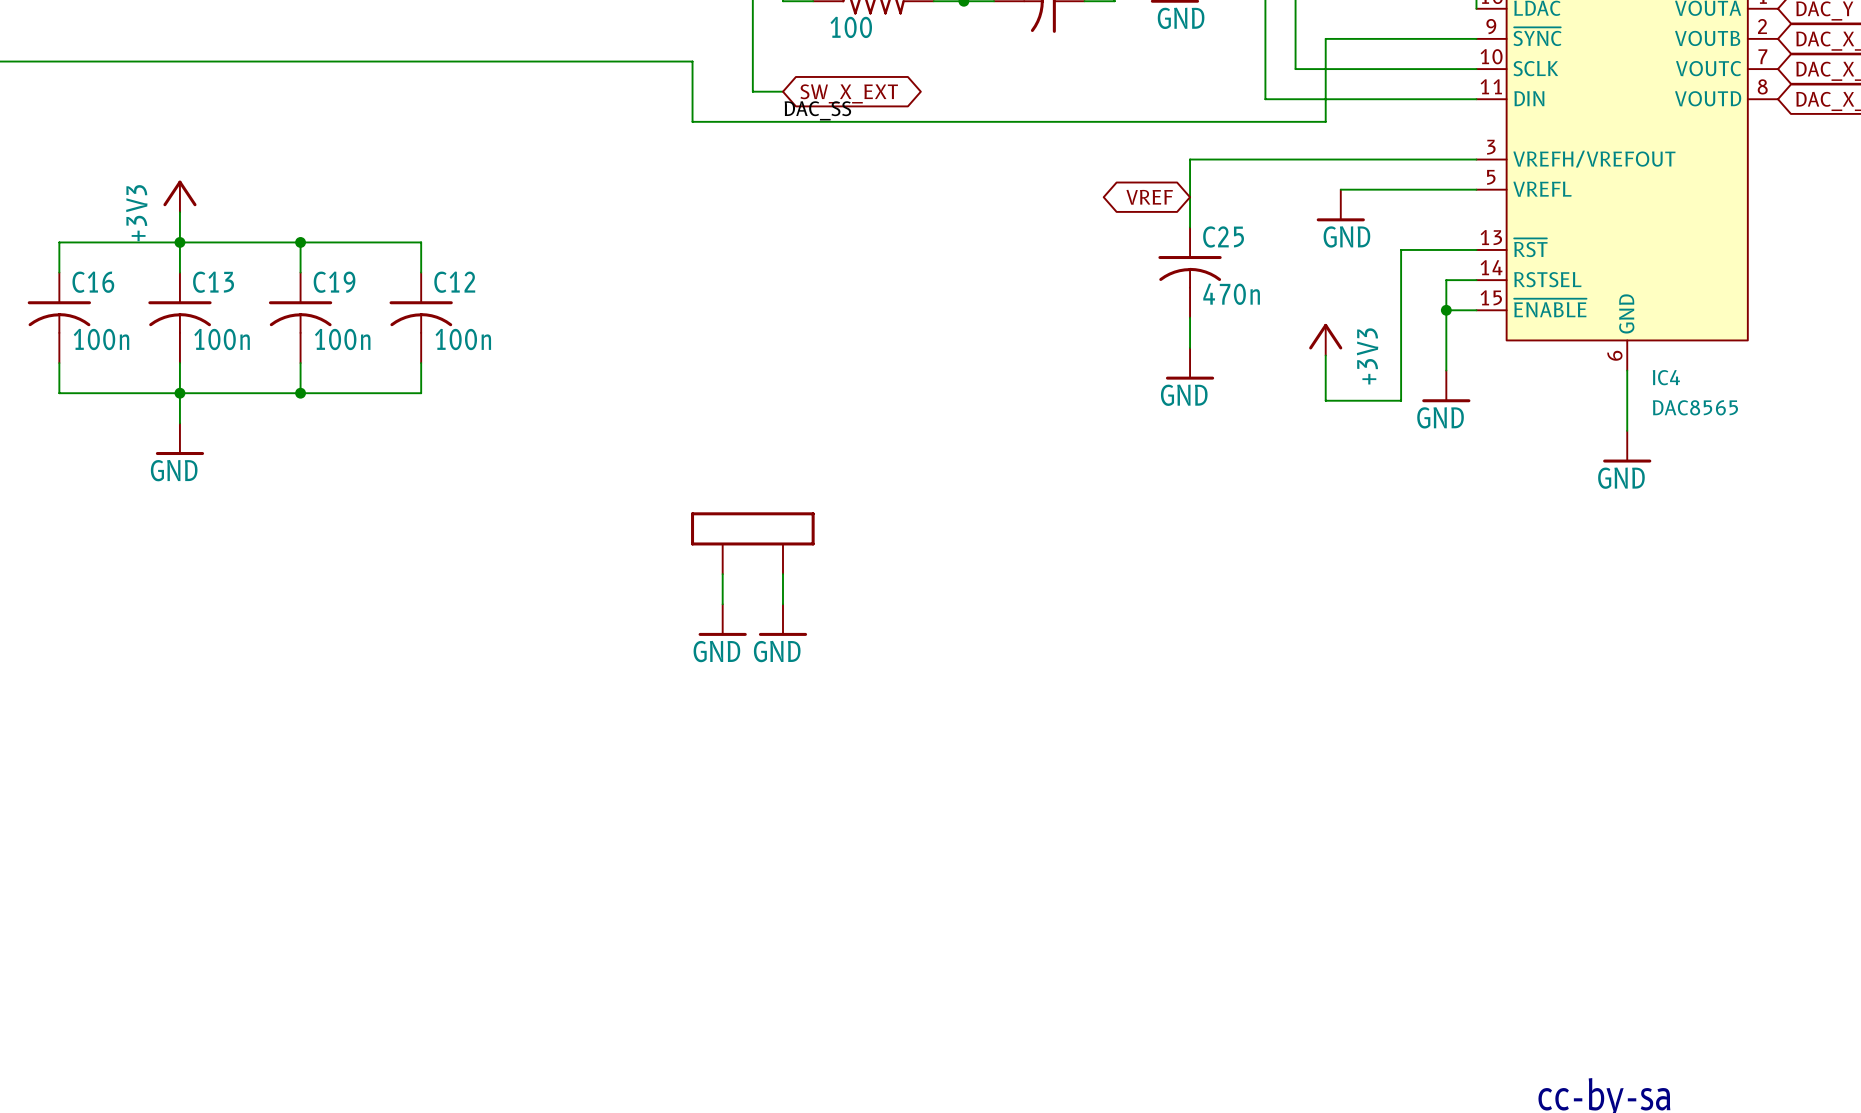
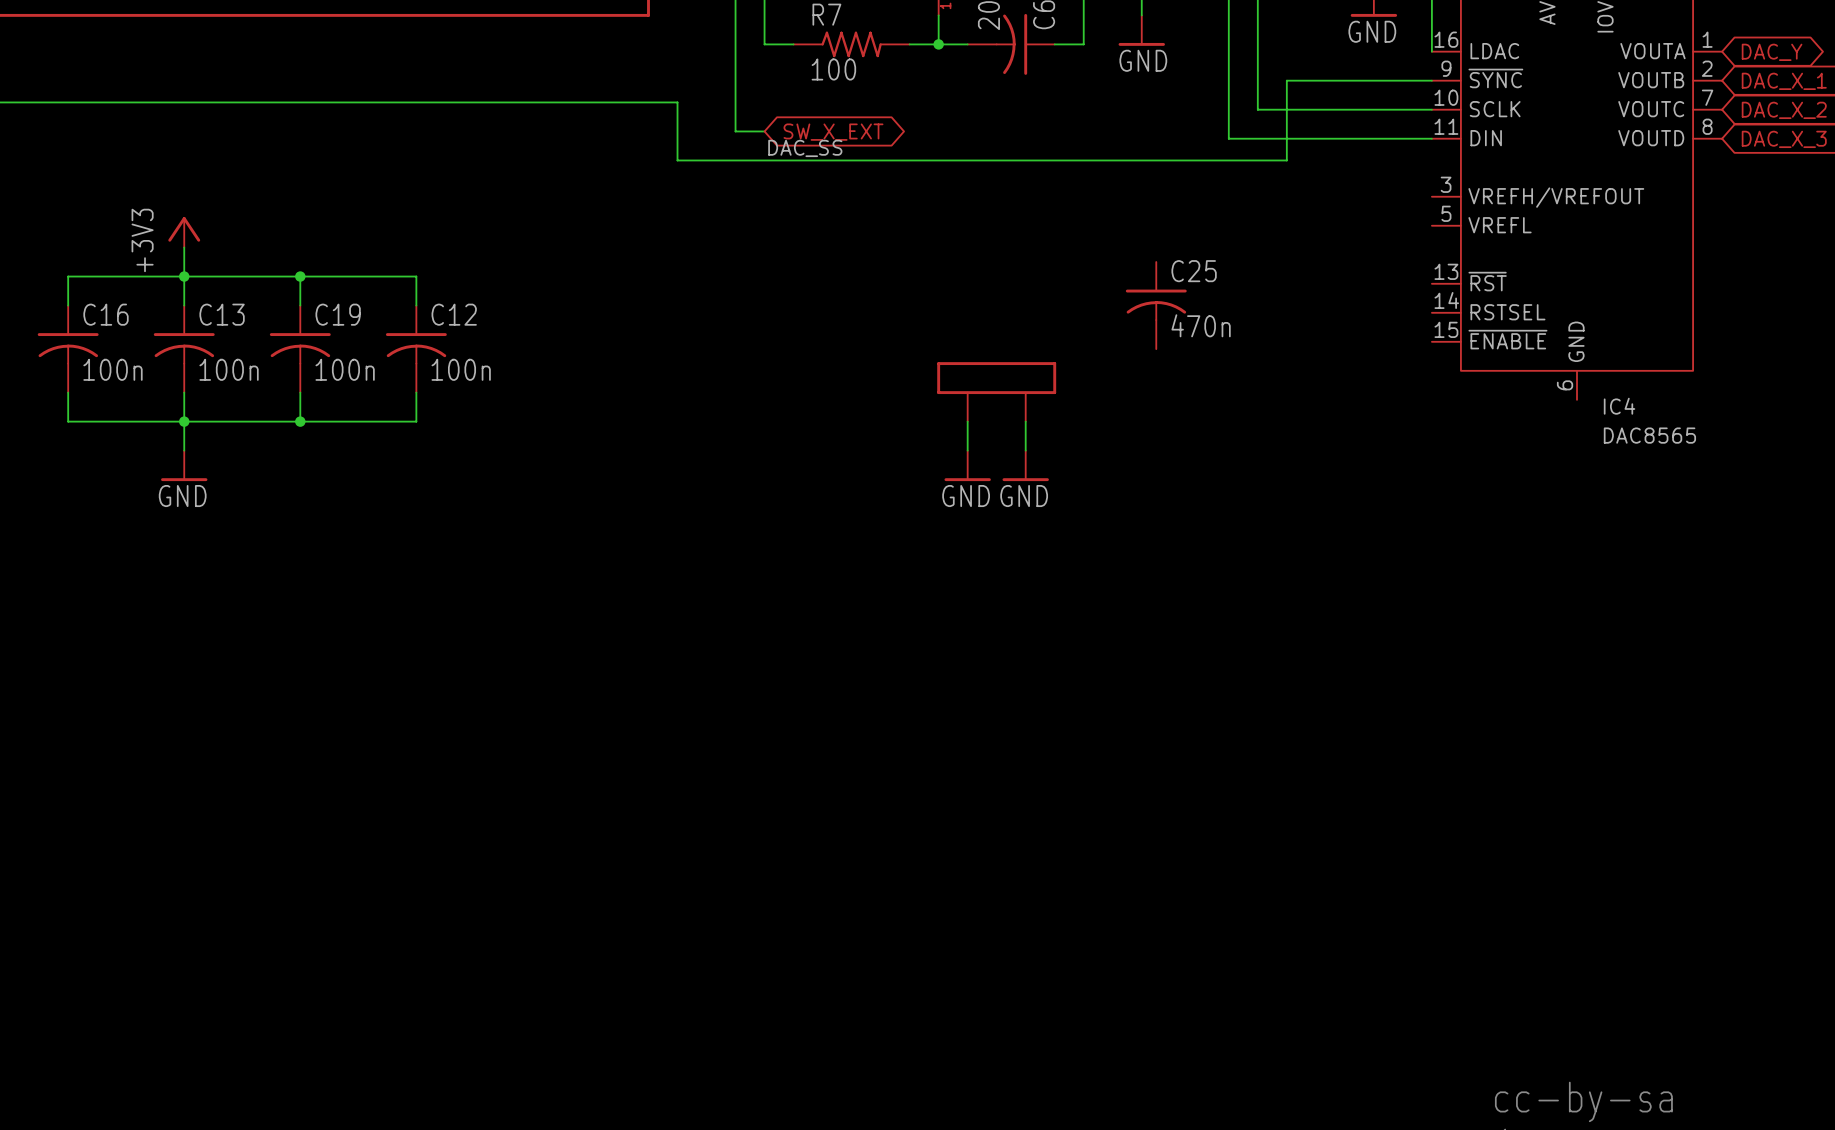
wire: (1476, 159) (1190, 159) (1190, 227) -> none
wire: (1340, 189) (1476, 189) -> none
global label: VREF (1149, 197) -> none
power symbol: GND (1340, 205) -> none
wire: (1476, 249) (1401, 249) (1401, 400) (1325, 400) (1325, 355) -> none
wire: (1476, 280) (1446, 280) (1446, 370) -> none
wire: (1446, 310) (1476, 310) -> none
junction: (1446, 310) -> none
wire: (1190, 317) (1190, 347) -> (1025, 421) (1025, 450)
power symbol: +3V3 (1325, 339) -> none
part: none -> (996, 391)
power symbol: GND (1190, 363) -> none
wire: (1627, 370) (1627, 430) -> none
power symbol: GND (1446, 386) -> none
power symbol: none -> GND (967, 465)
power symbol: none -> GND (1025, 465)
power symbol: GND (1627, 446) -> none
part: (752, 543) -> none
wire: (722, 574) (722, 604) -> none
wire: (782, 574) (782, 604) -> (967, 421) (967, 450)
power symbol: GND (722, 620) -> none
power symbol: GND (782, 620) -> none

